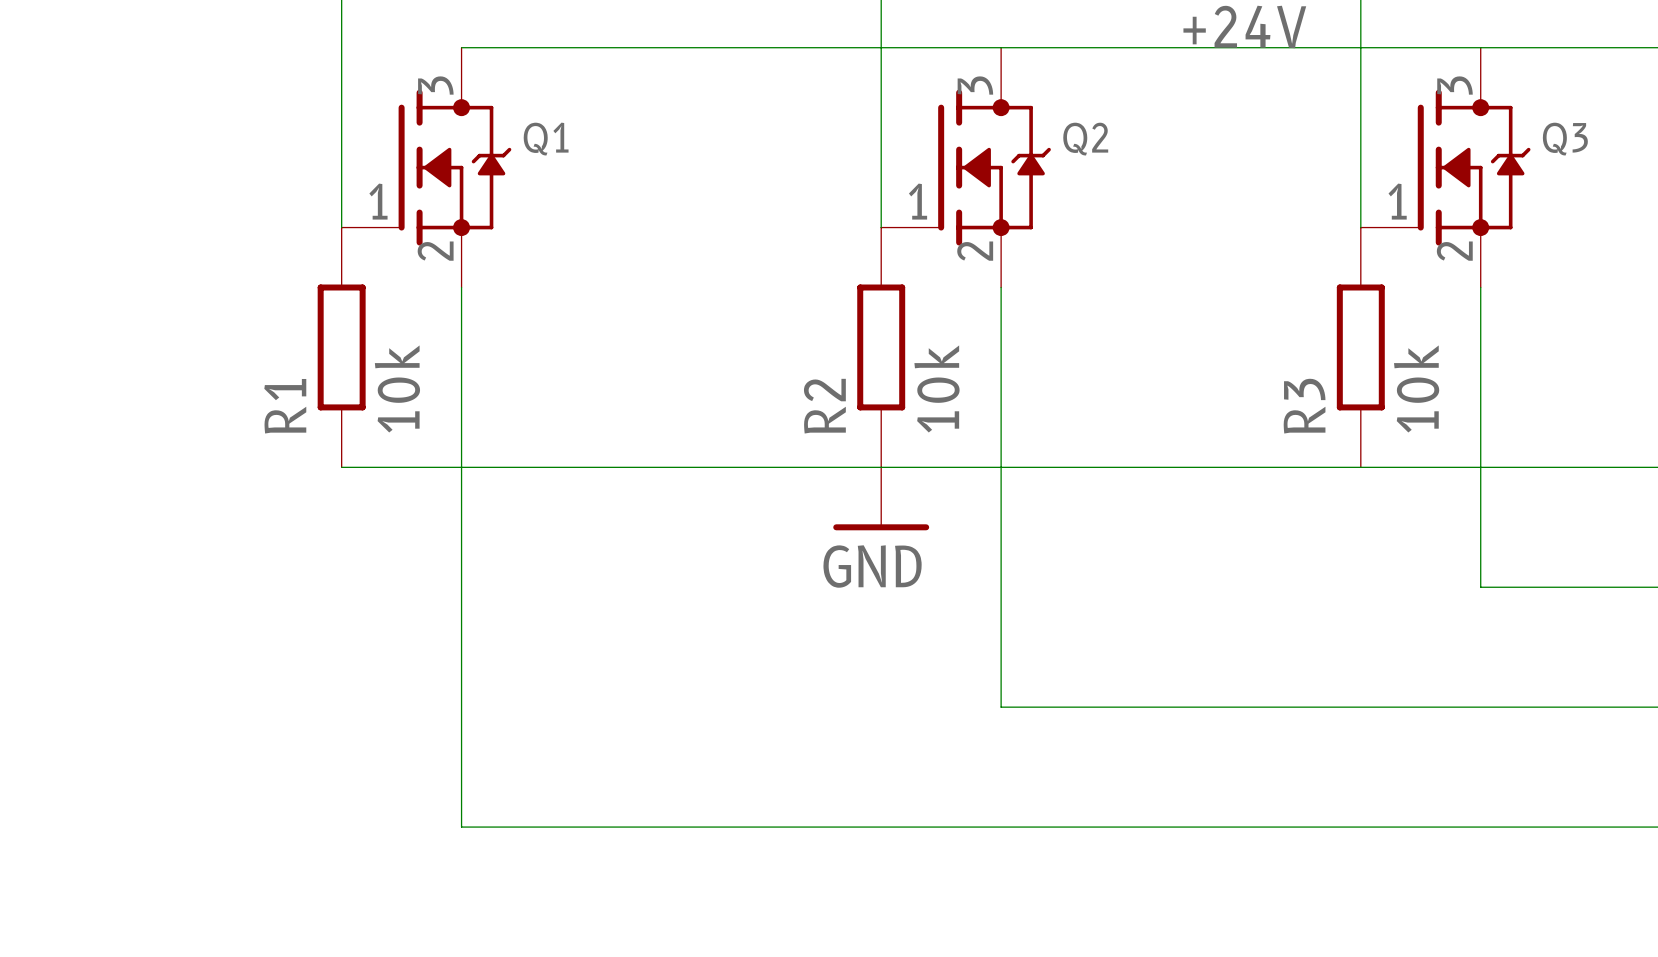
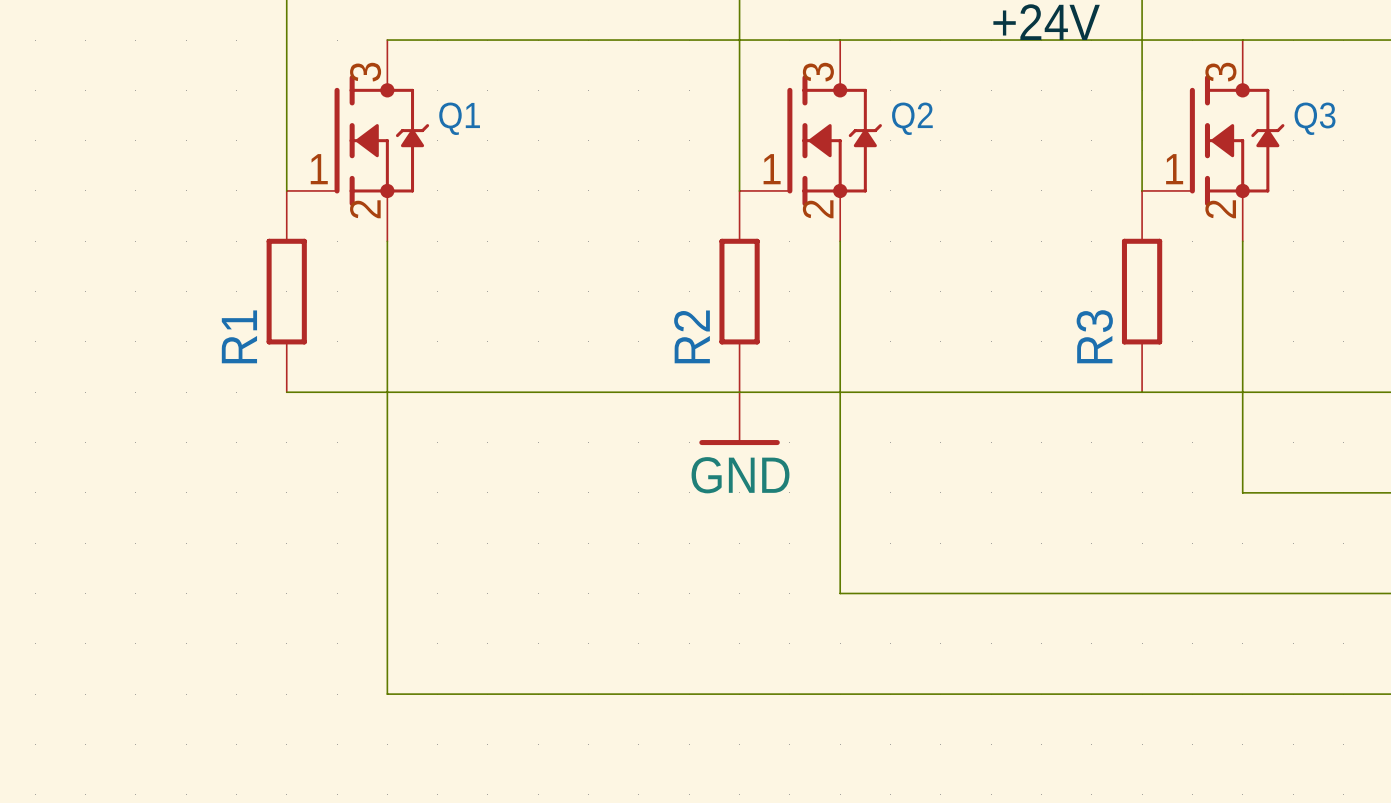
R1 value: 10k (397, 388) -> none
R2 value: 10k (937, 388) -> none
R3 value: 10k (1416, 388) -> none

